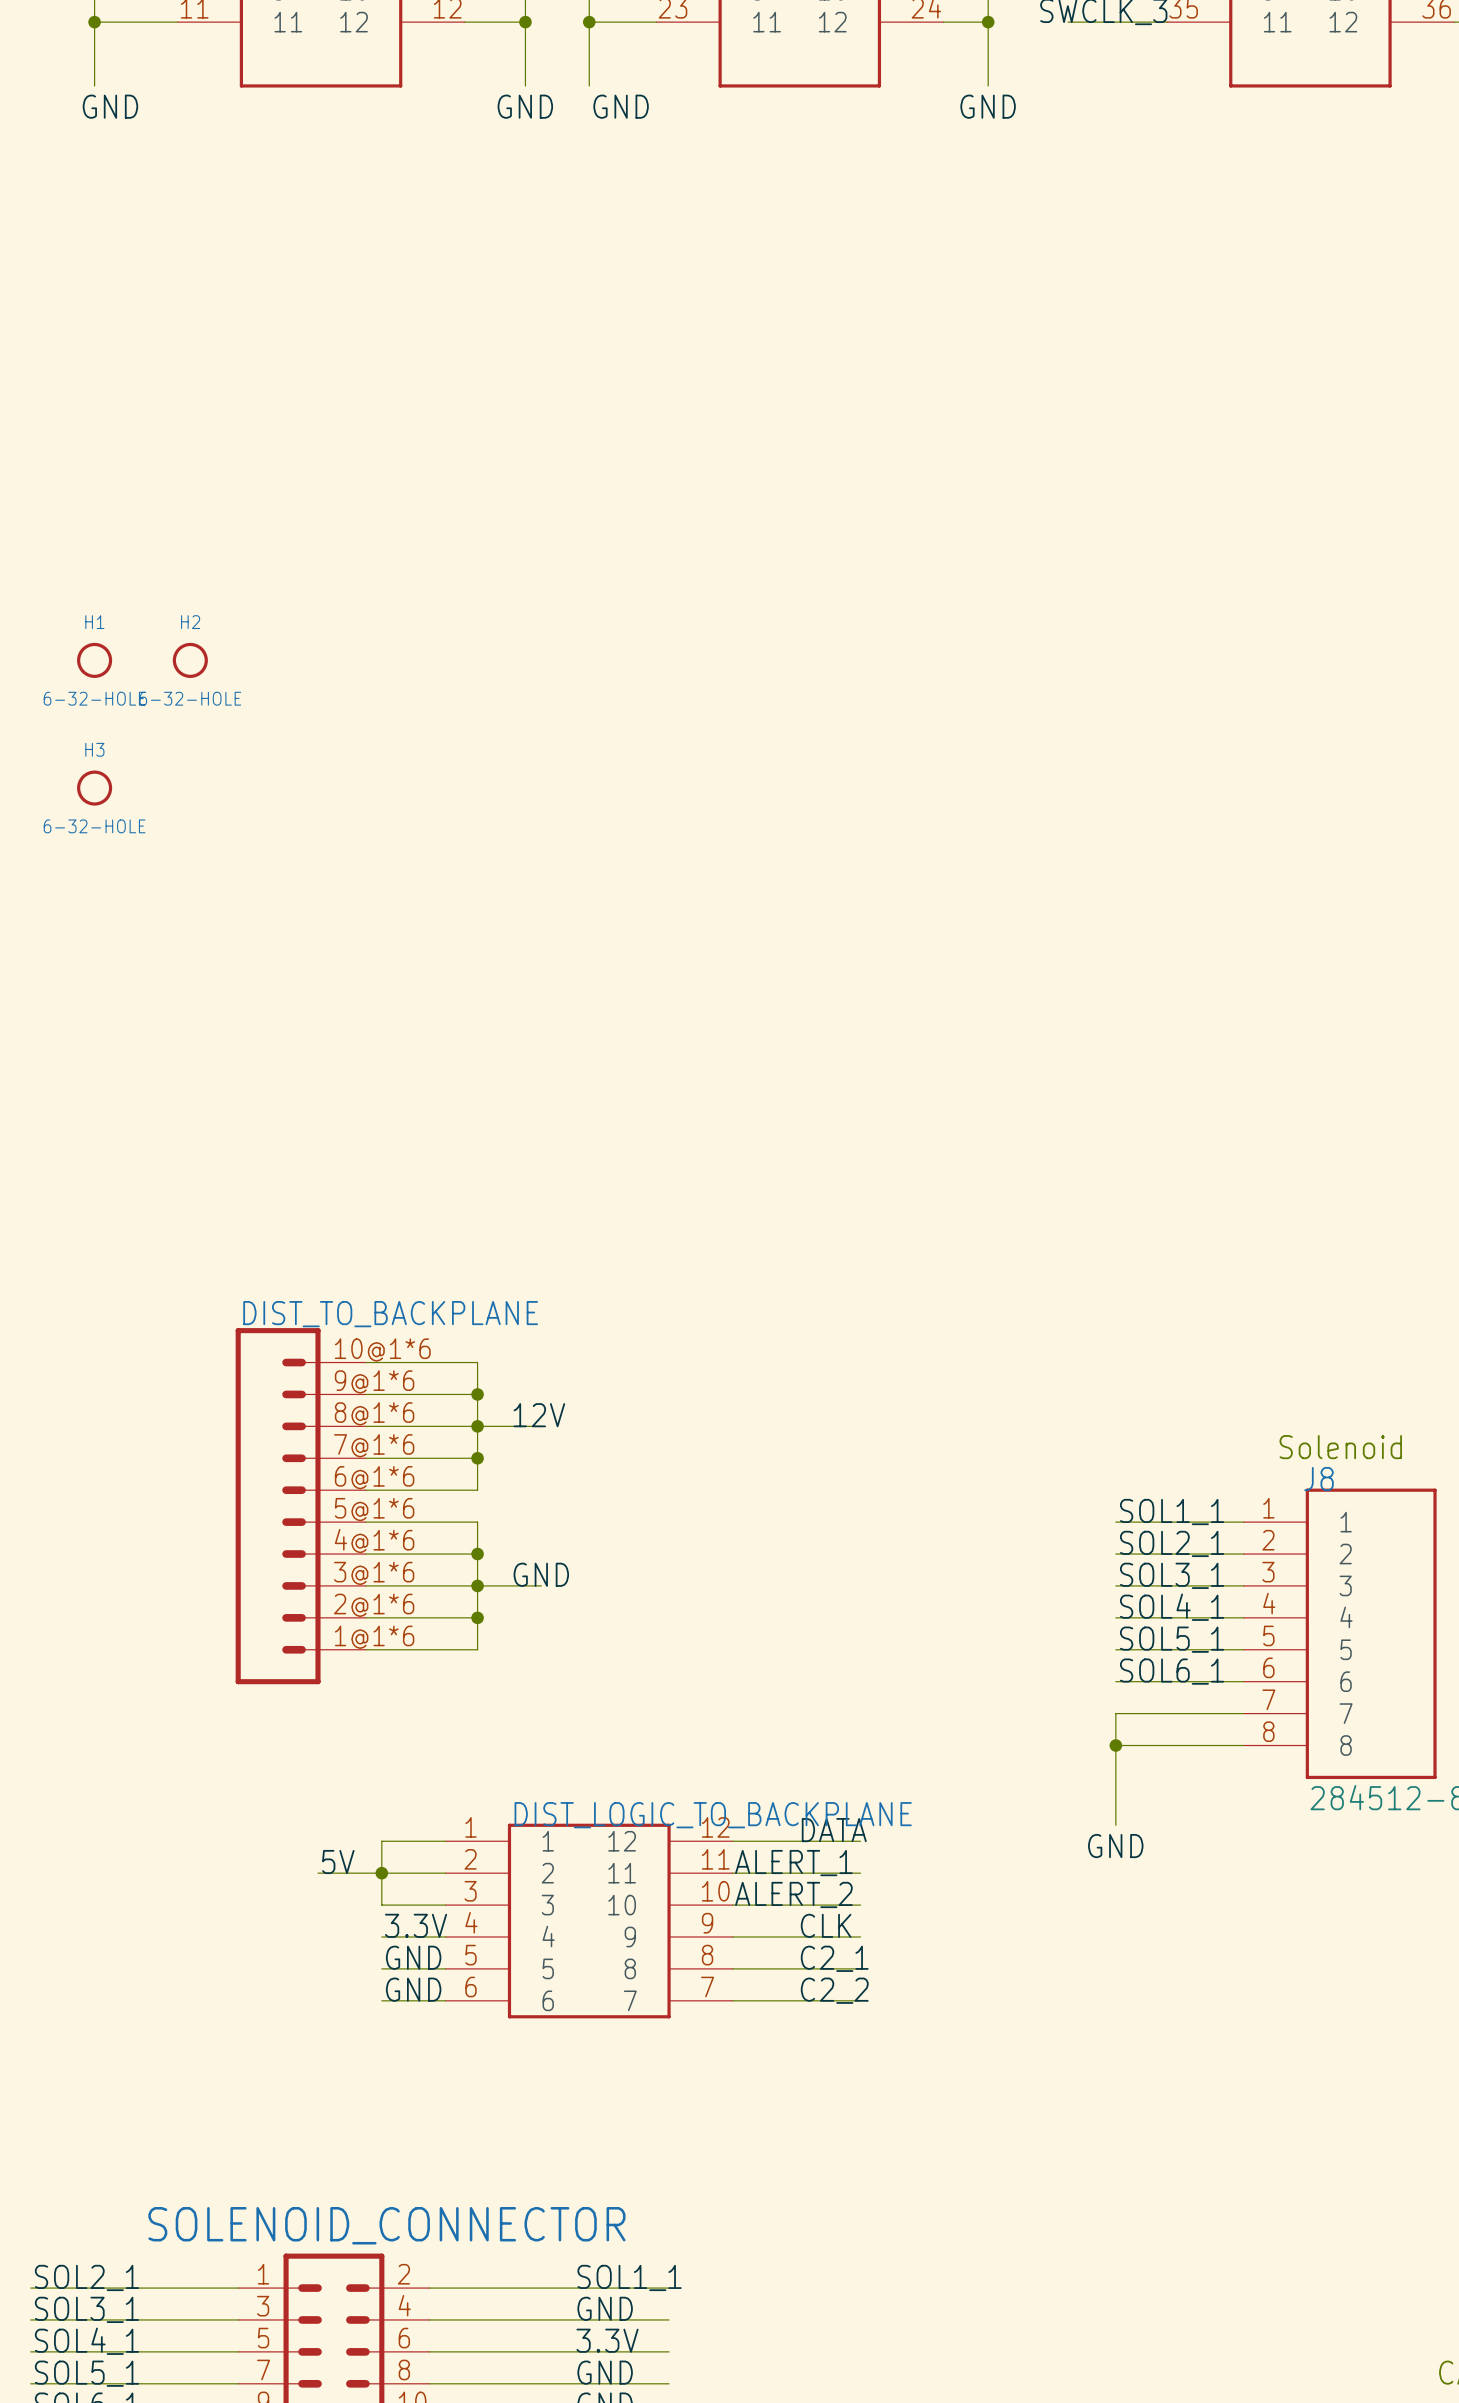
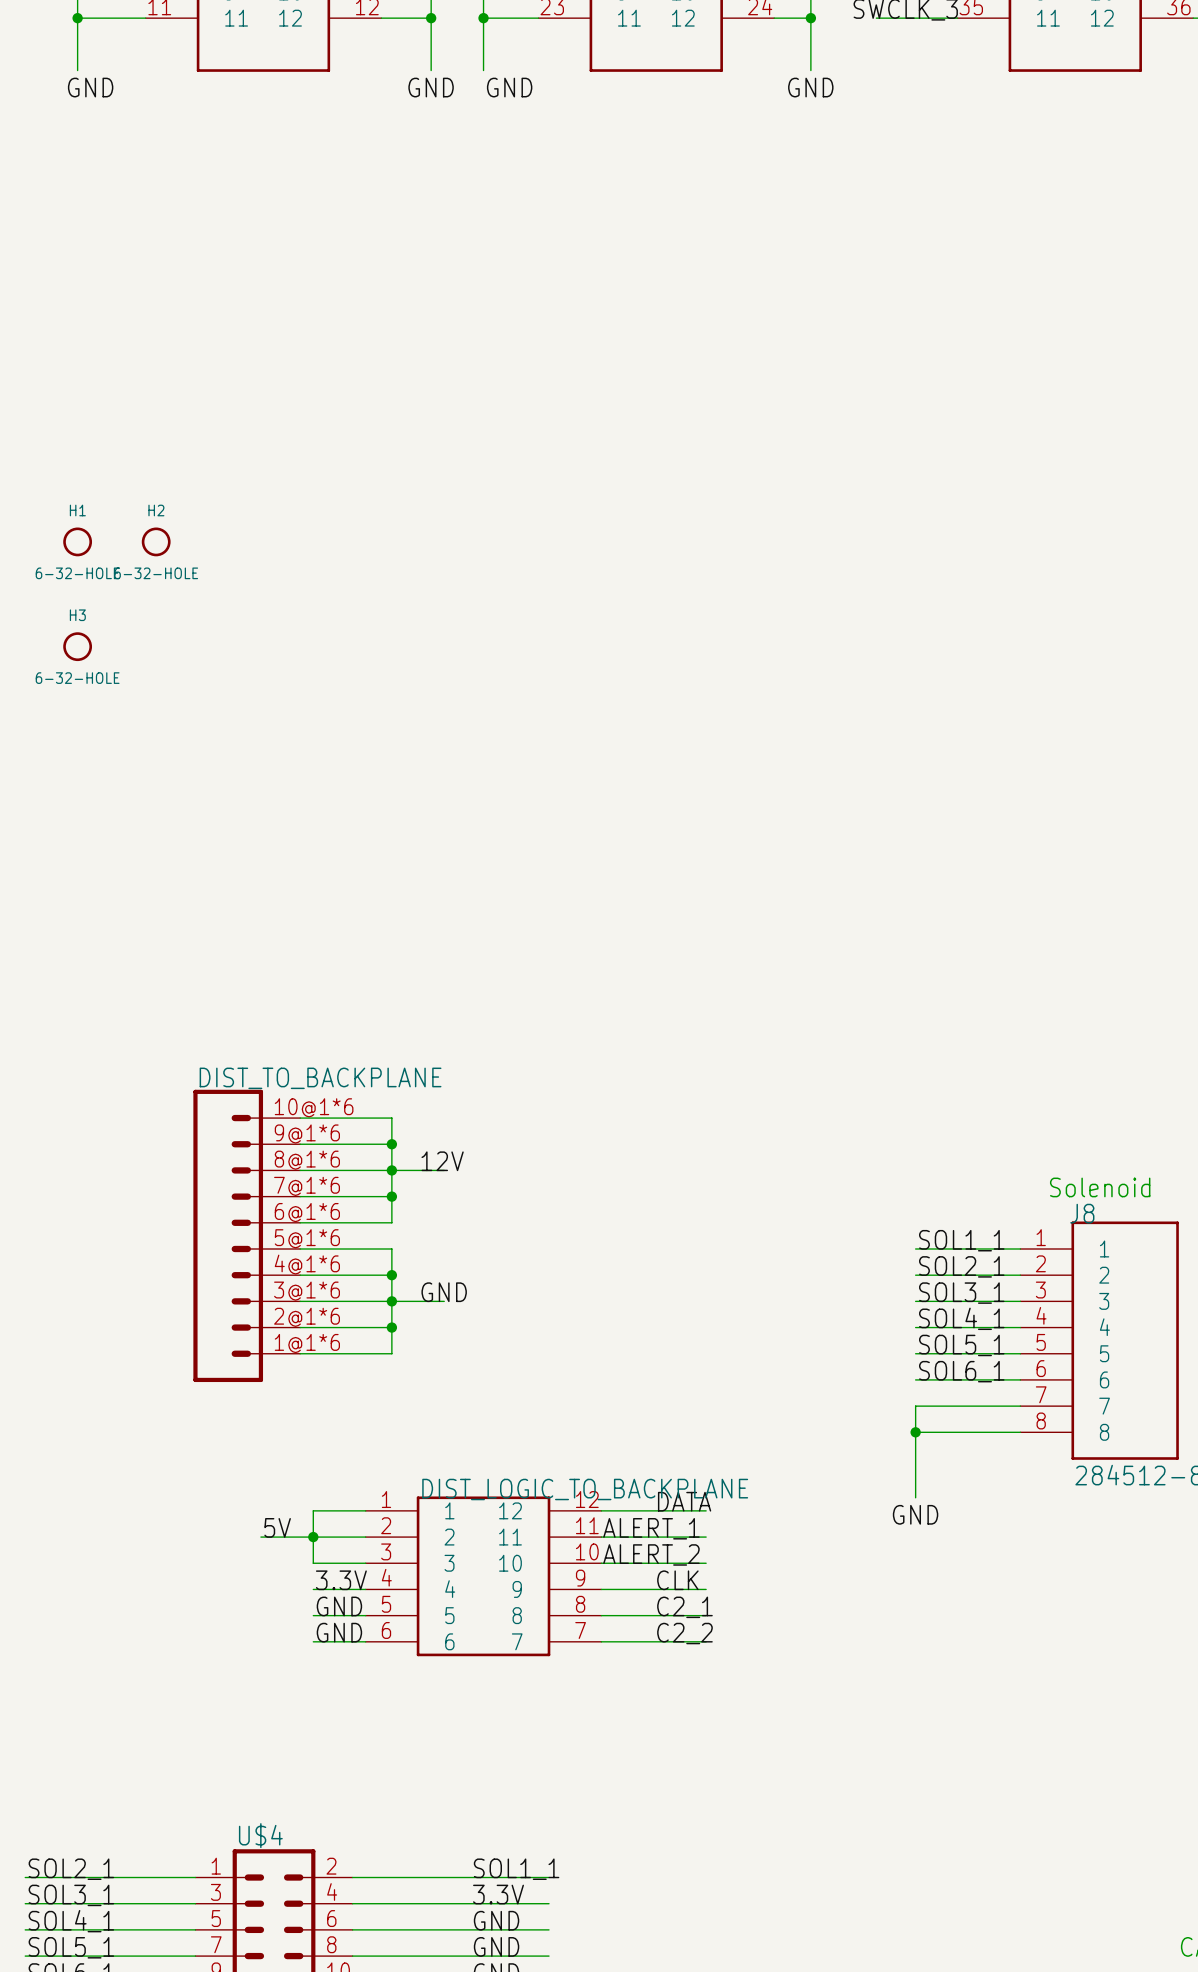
SOLENOID_CONNECTOR name: SOLENOID_CONNECTOR (386, 2225) -> U$4 (260, 1835)
label: GND (605, 2308) -> 3.3V (498, 1894)
label: 3.3V (607, 2340) -> GND (496, 1920)

